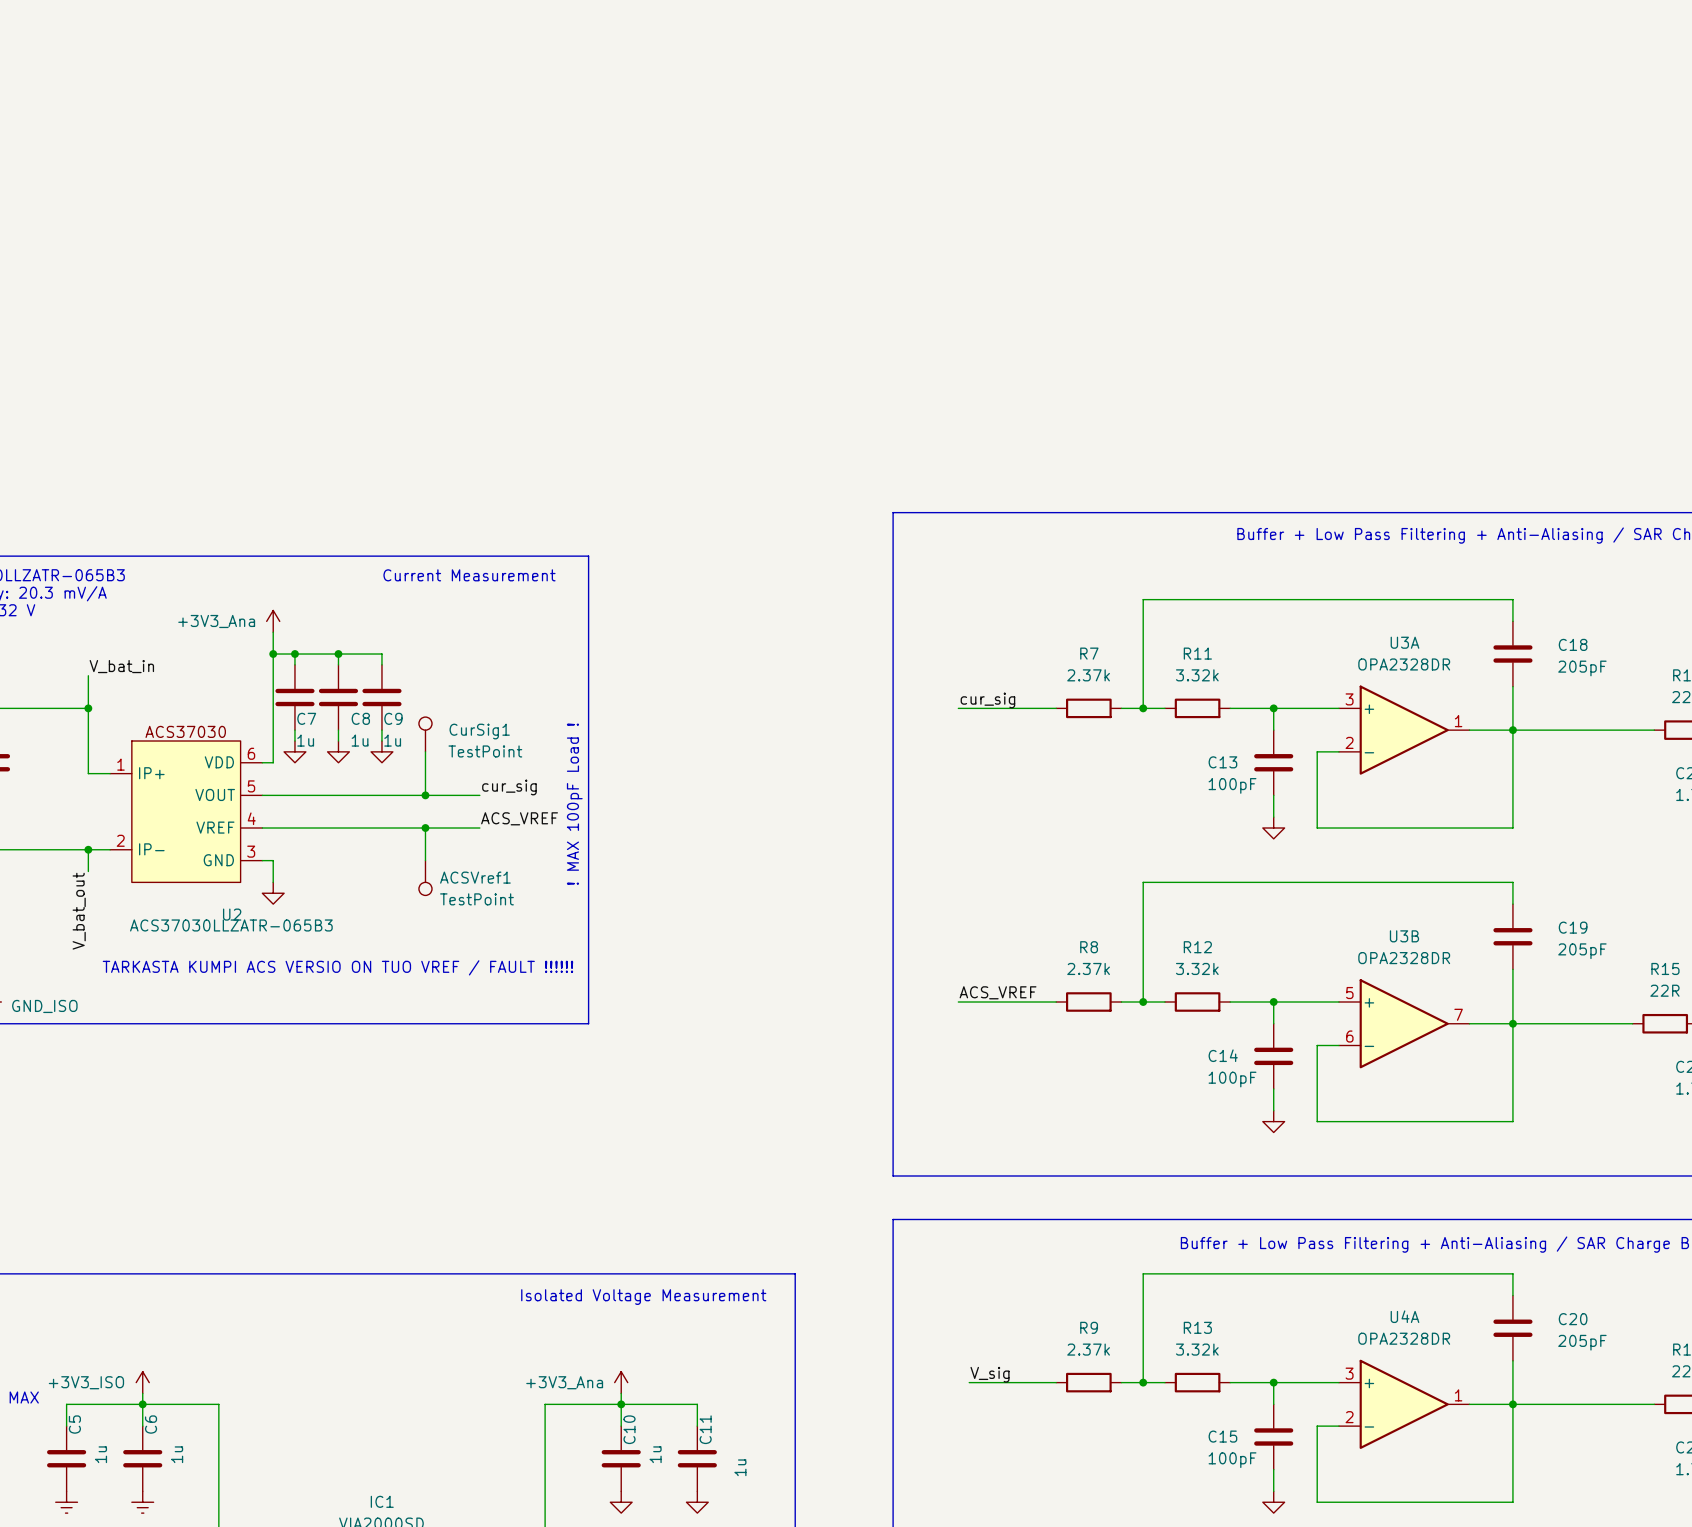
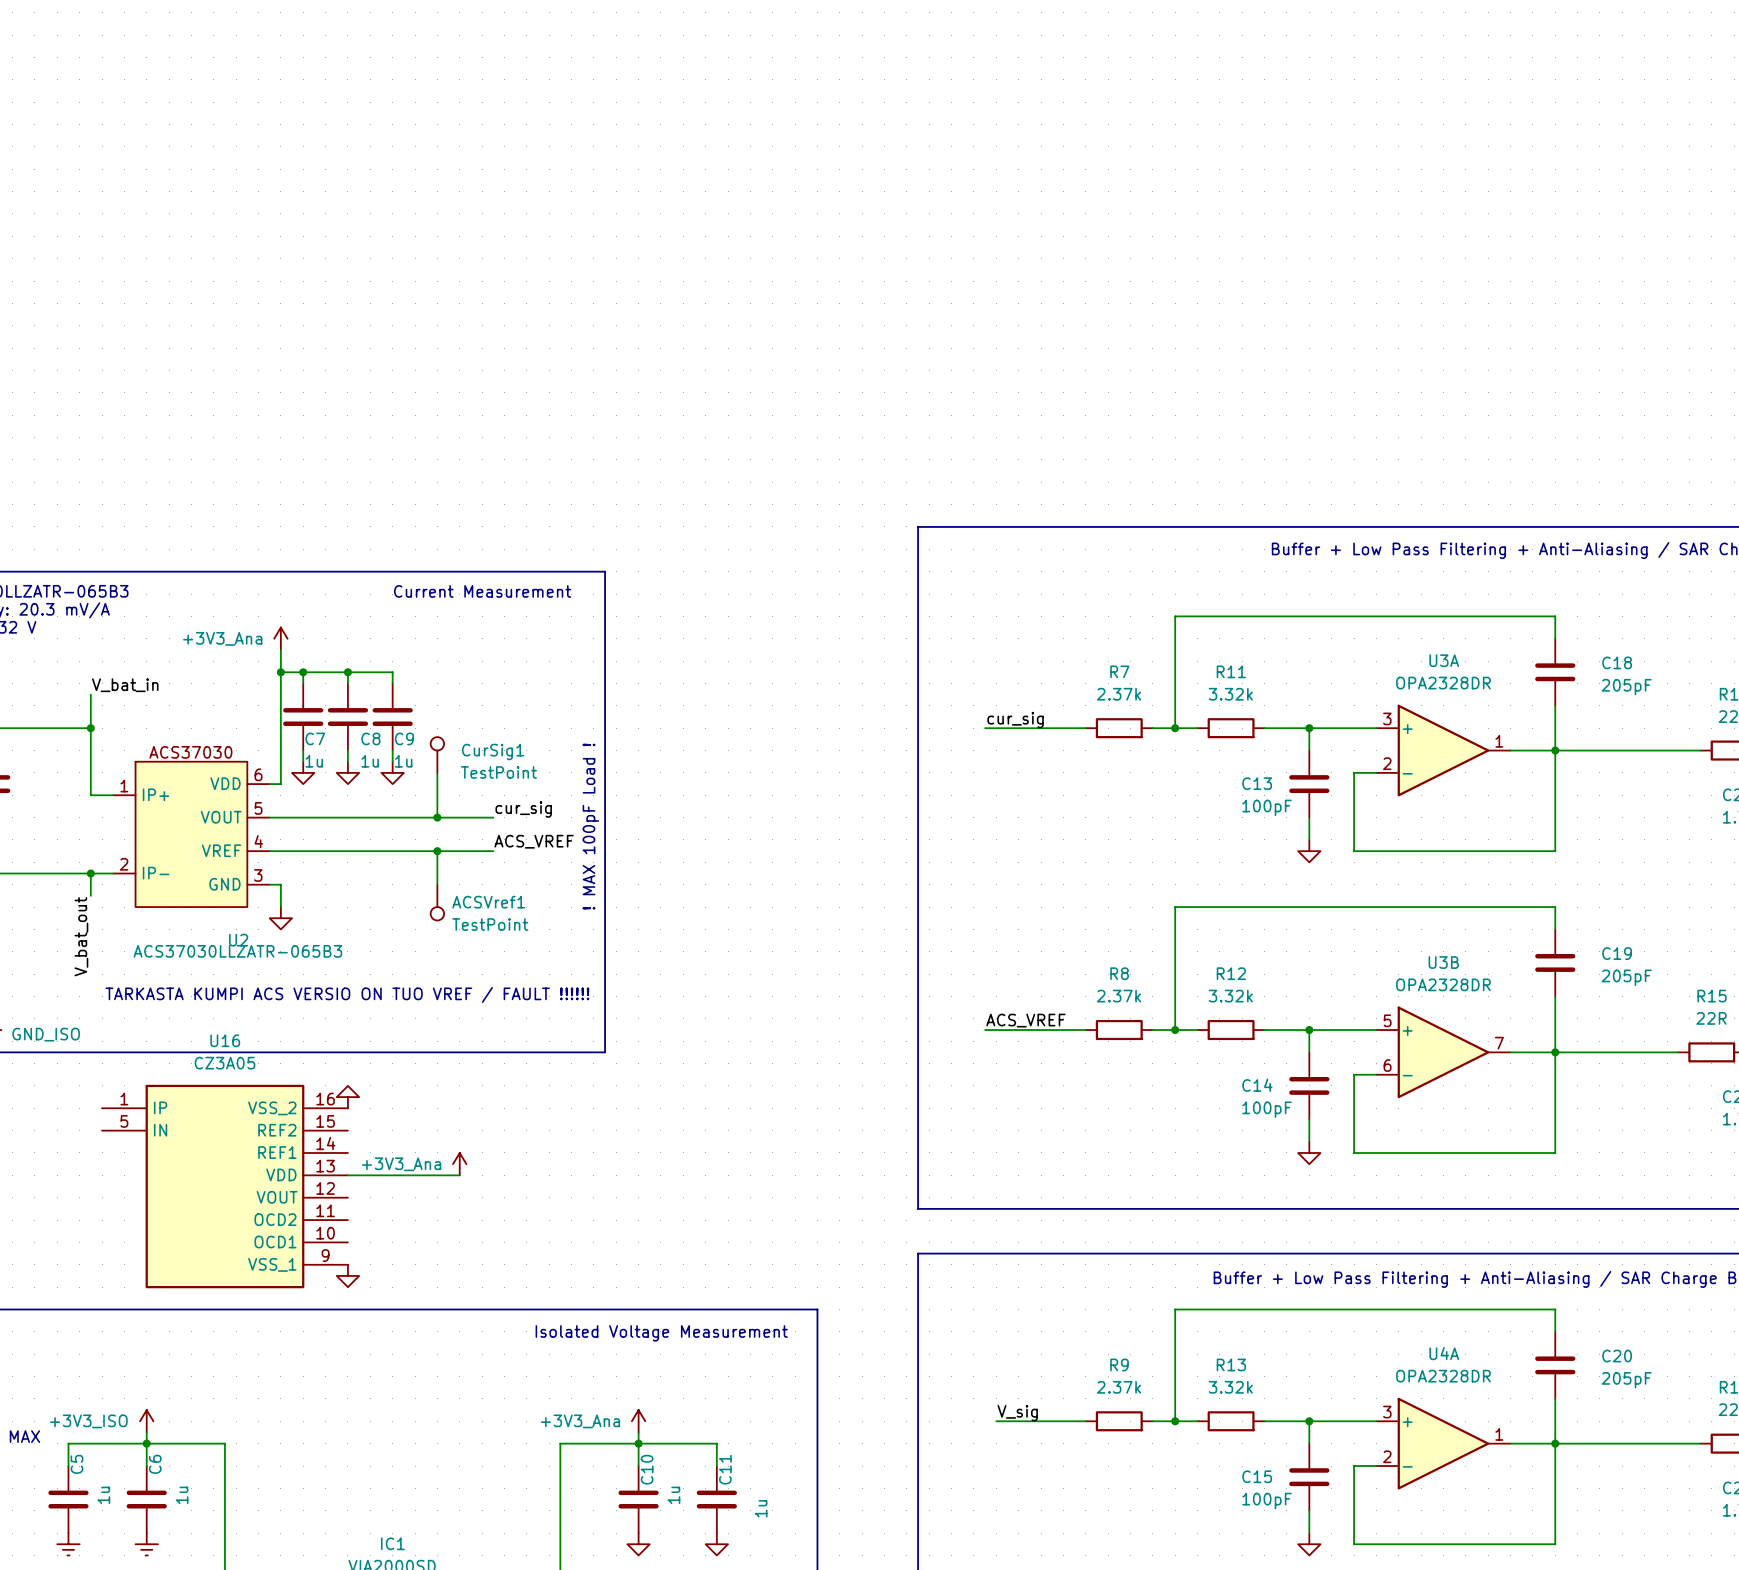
power symbol: none -> (347, 1097)
power symbol: none -> +3V3_Ana (459, 1164)
wire: none -> (347, 1175) (459, 1175)
U16: none -> CZ3A05 (224, 1186)
power symbol: none -> (347, 1275)

